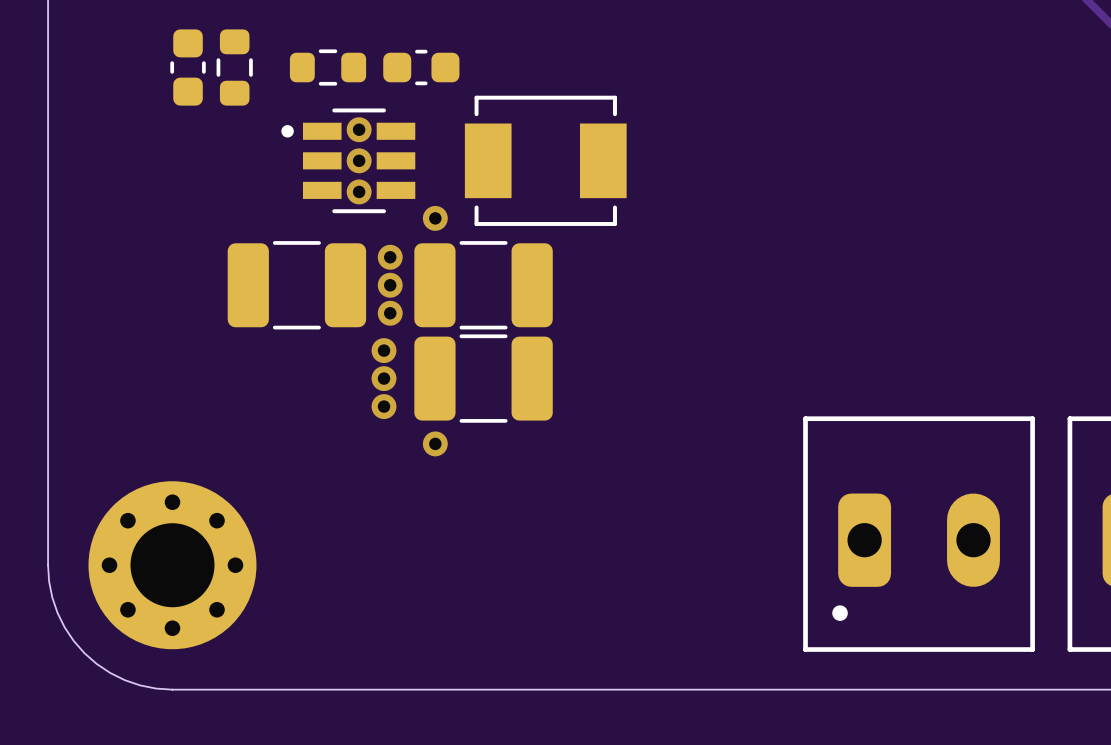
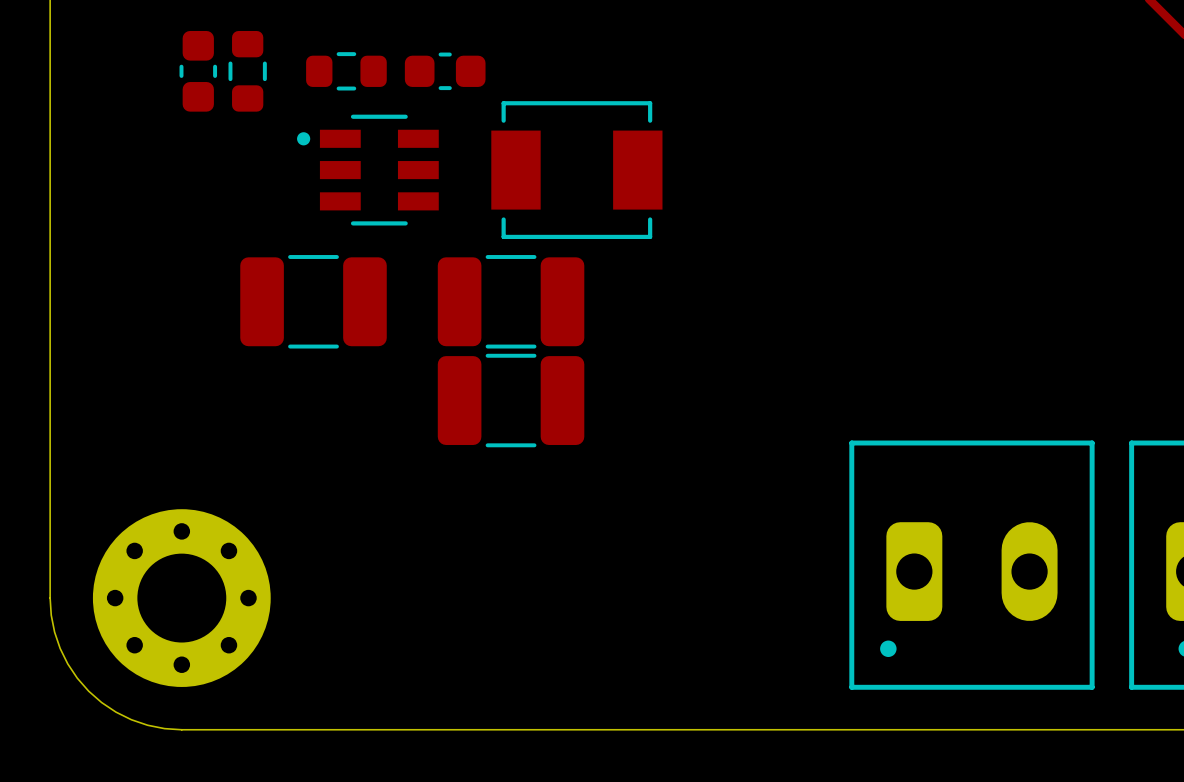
via: (359, 129) -> none
via: (359, 160) -> none
via: (359, 191) -> none
via: (435, 218) -> none
via: (390, 257) -> none
via: (390, 285) -> none
via: (390, 313) -> none
via: (384, 350) -> none
via: (384, 378) -> none
via: (384, 406) -> none
via: (435, 443) -> none

